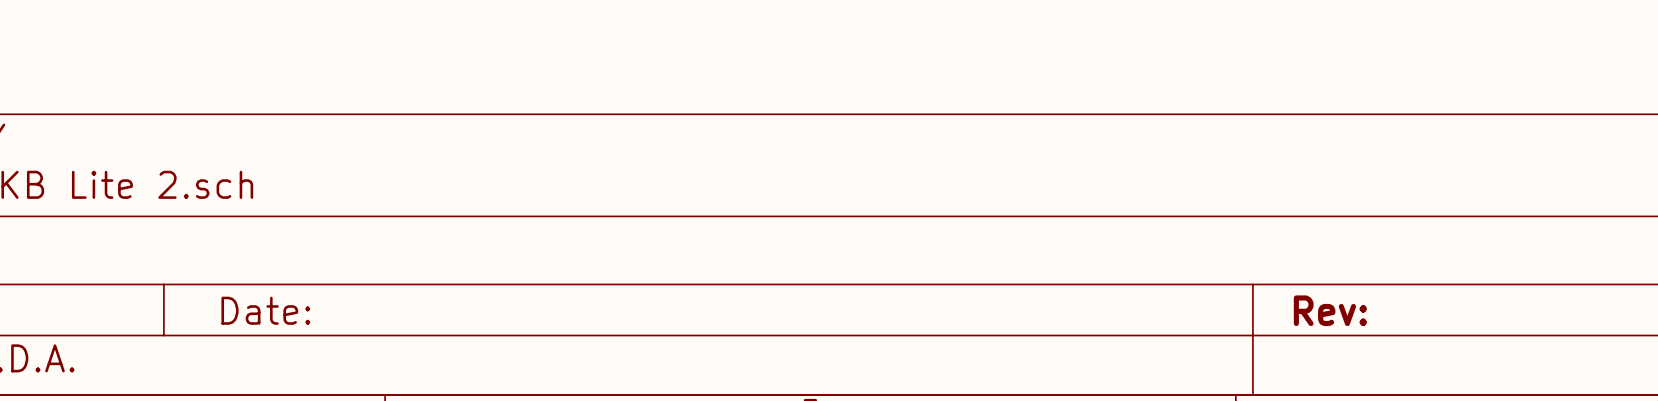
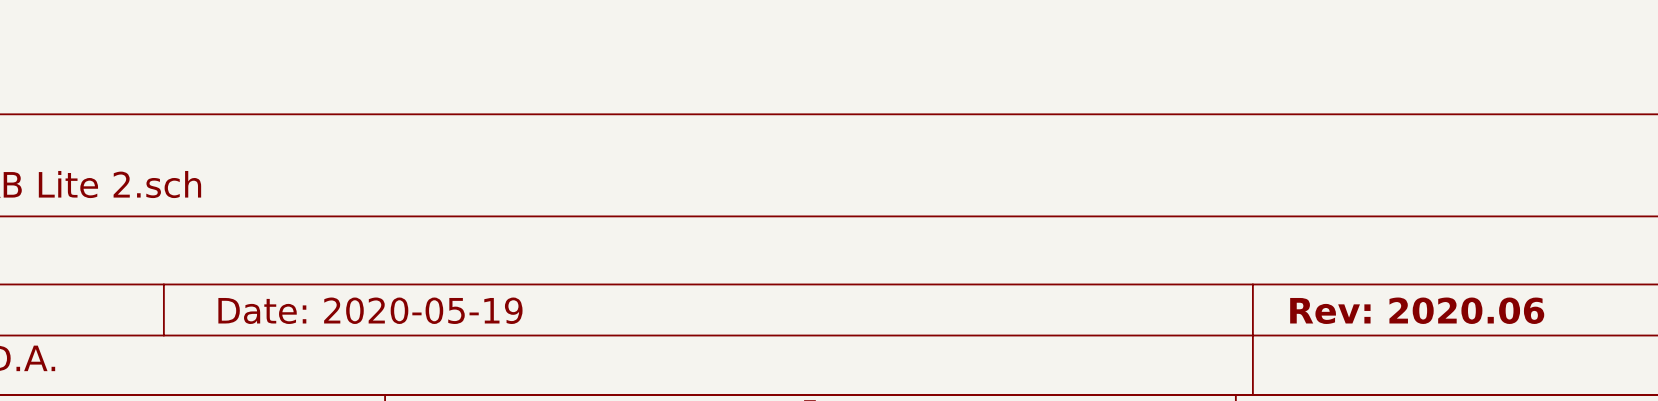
title block: Date: (265, 310) -> Date: 2020-05-19 (370, 310)
title block: Rev: (1330, 310) -> Rev: 2020.06 (1417, 310)

